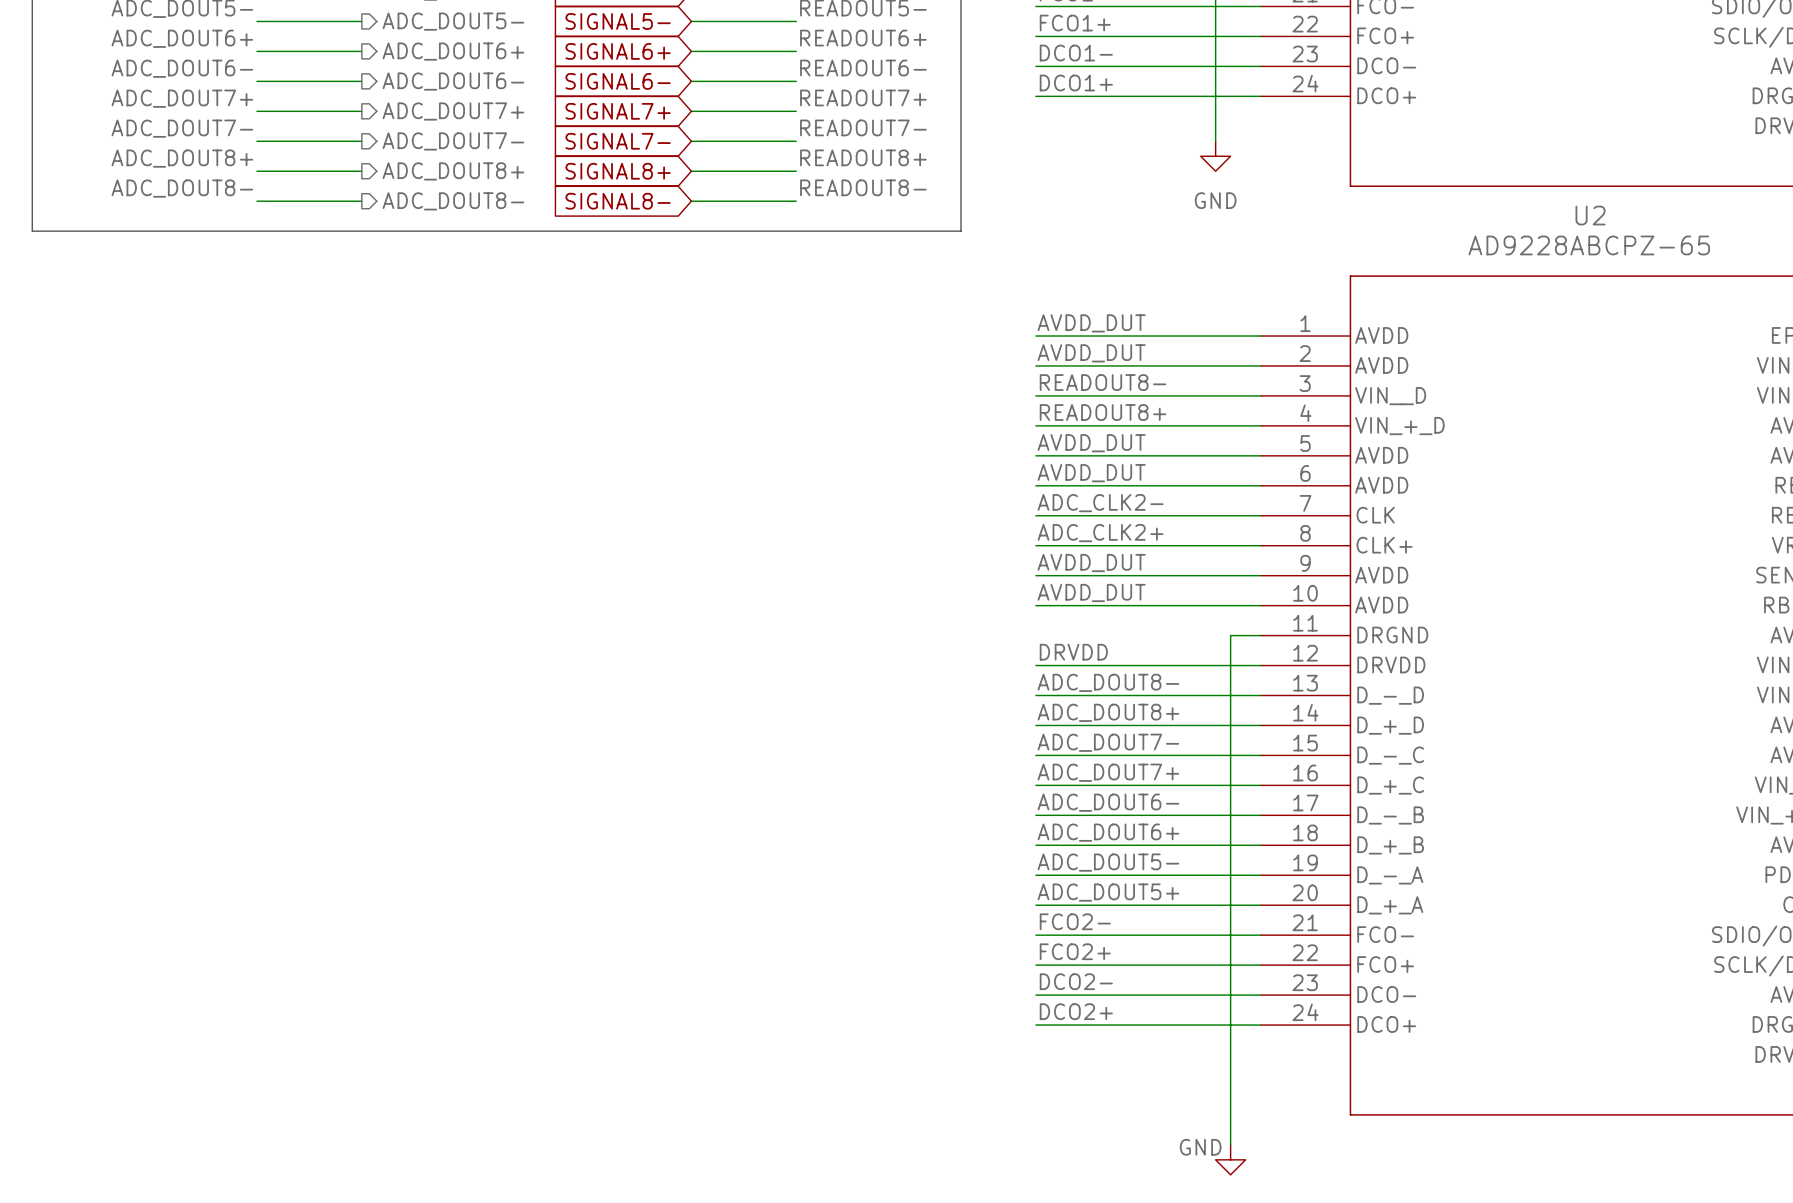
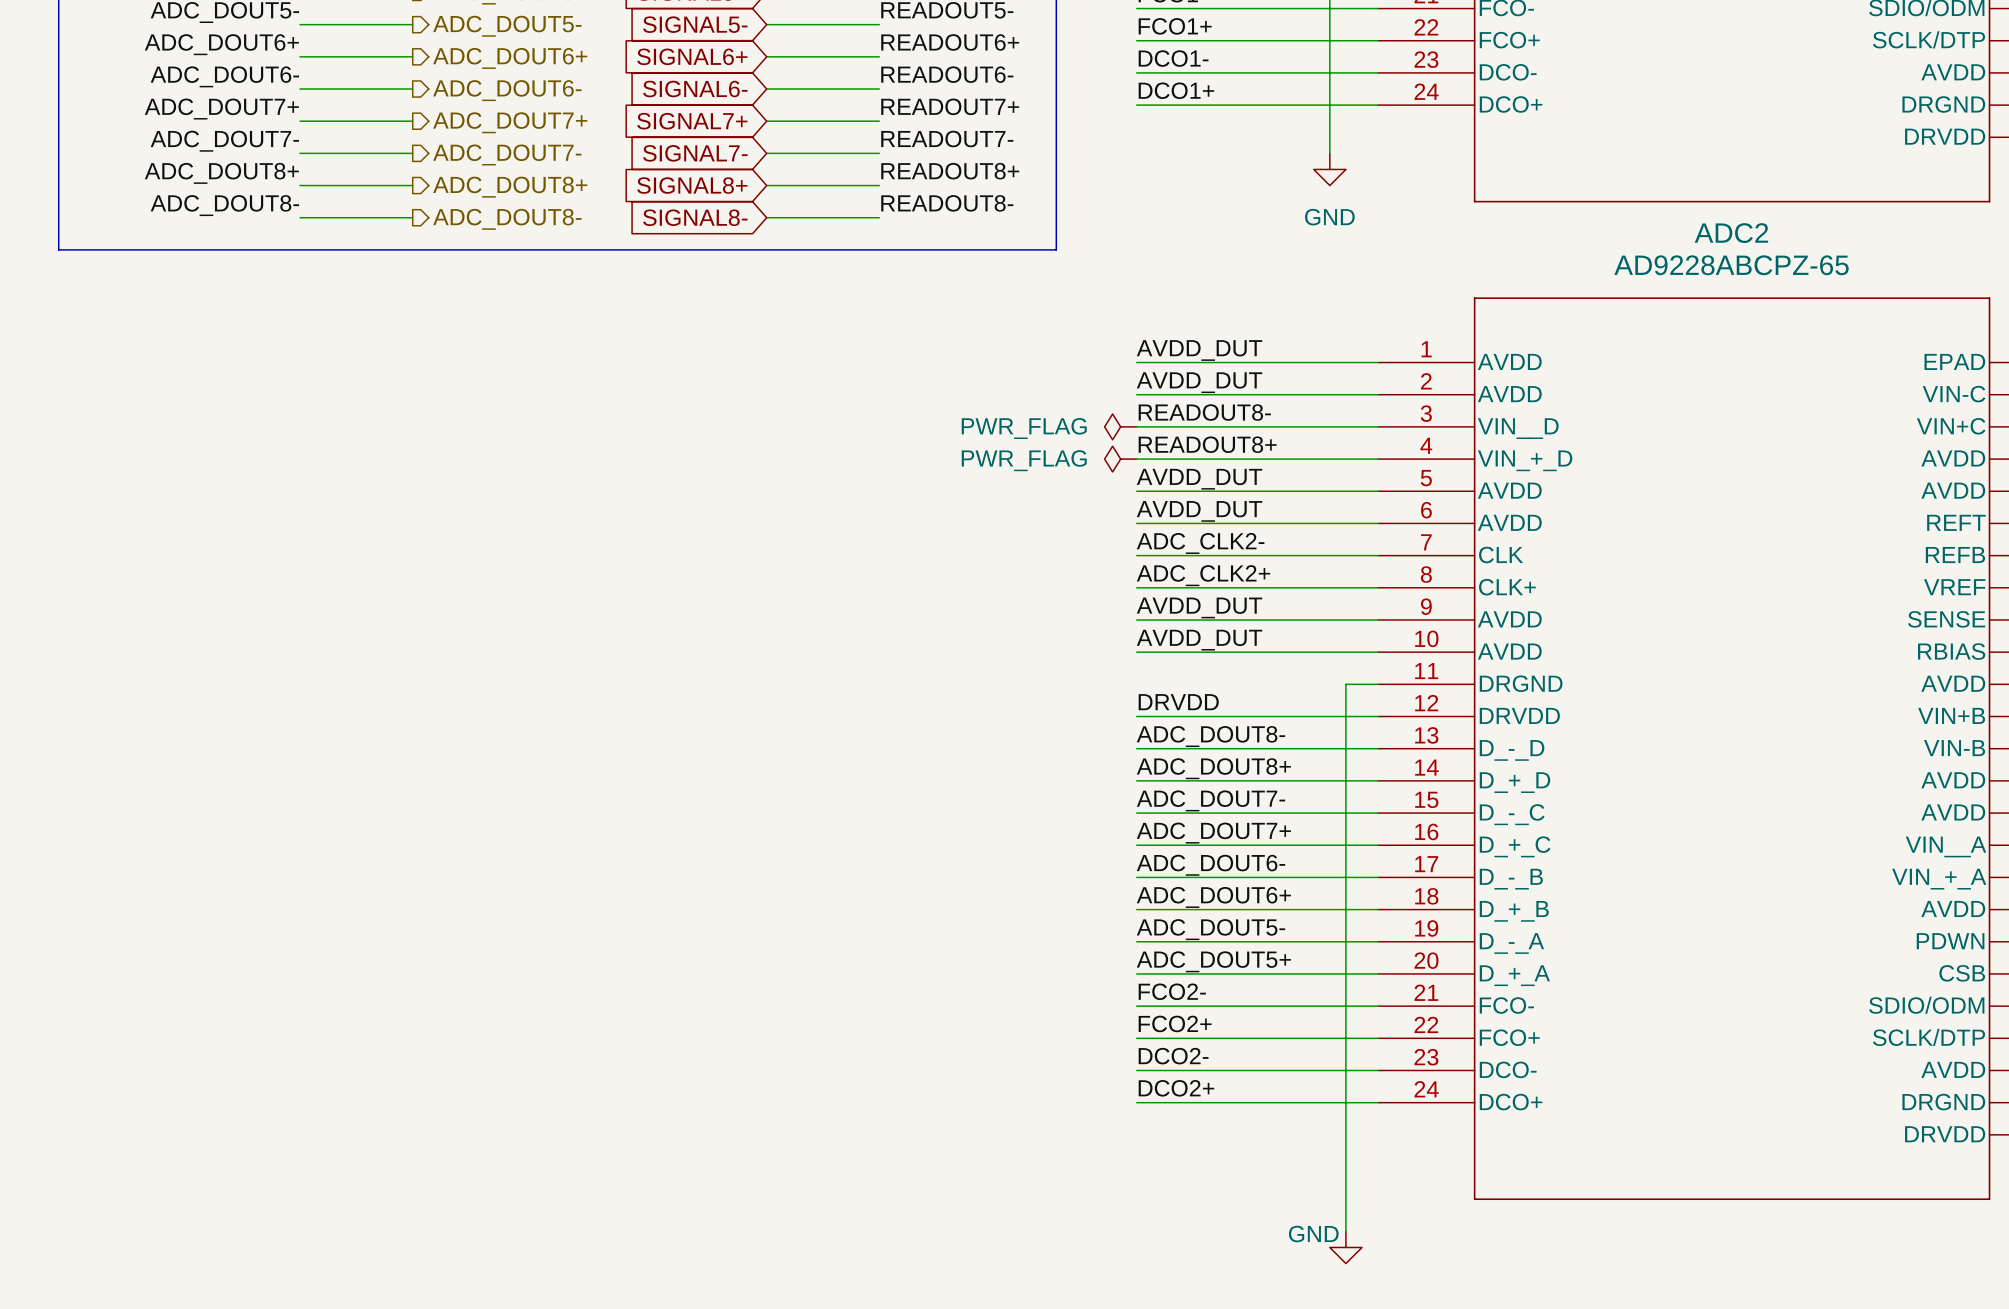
U2 name: U2 (1590, 215) -> ADC2 (1731, 233)
power symbol: none -> PWR_FLAG (1120, 426)
power symbol: none -> PWR_FLAG (1120, 459)

